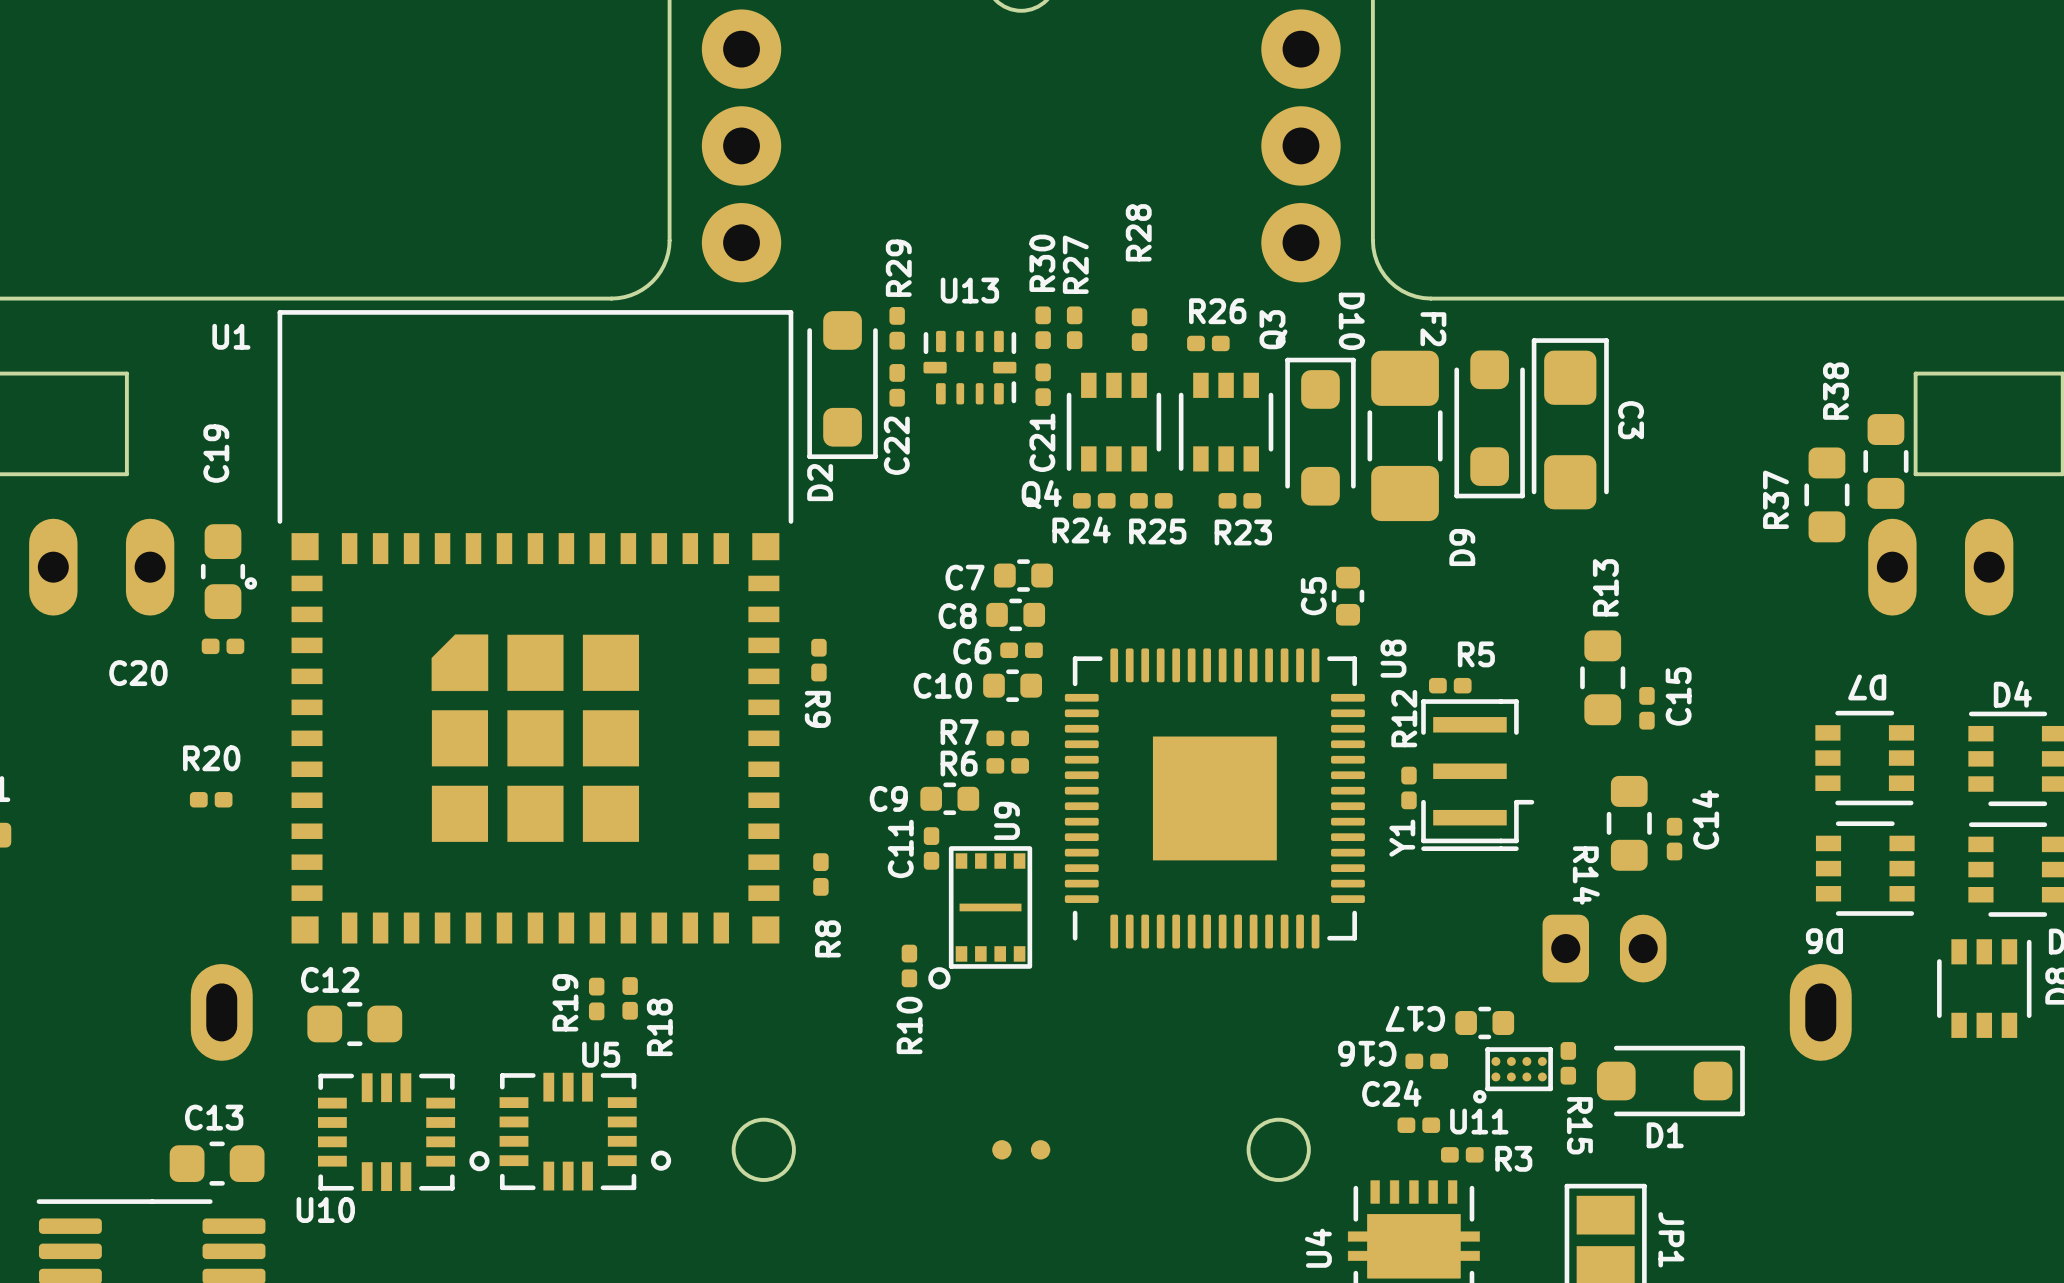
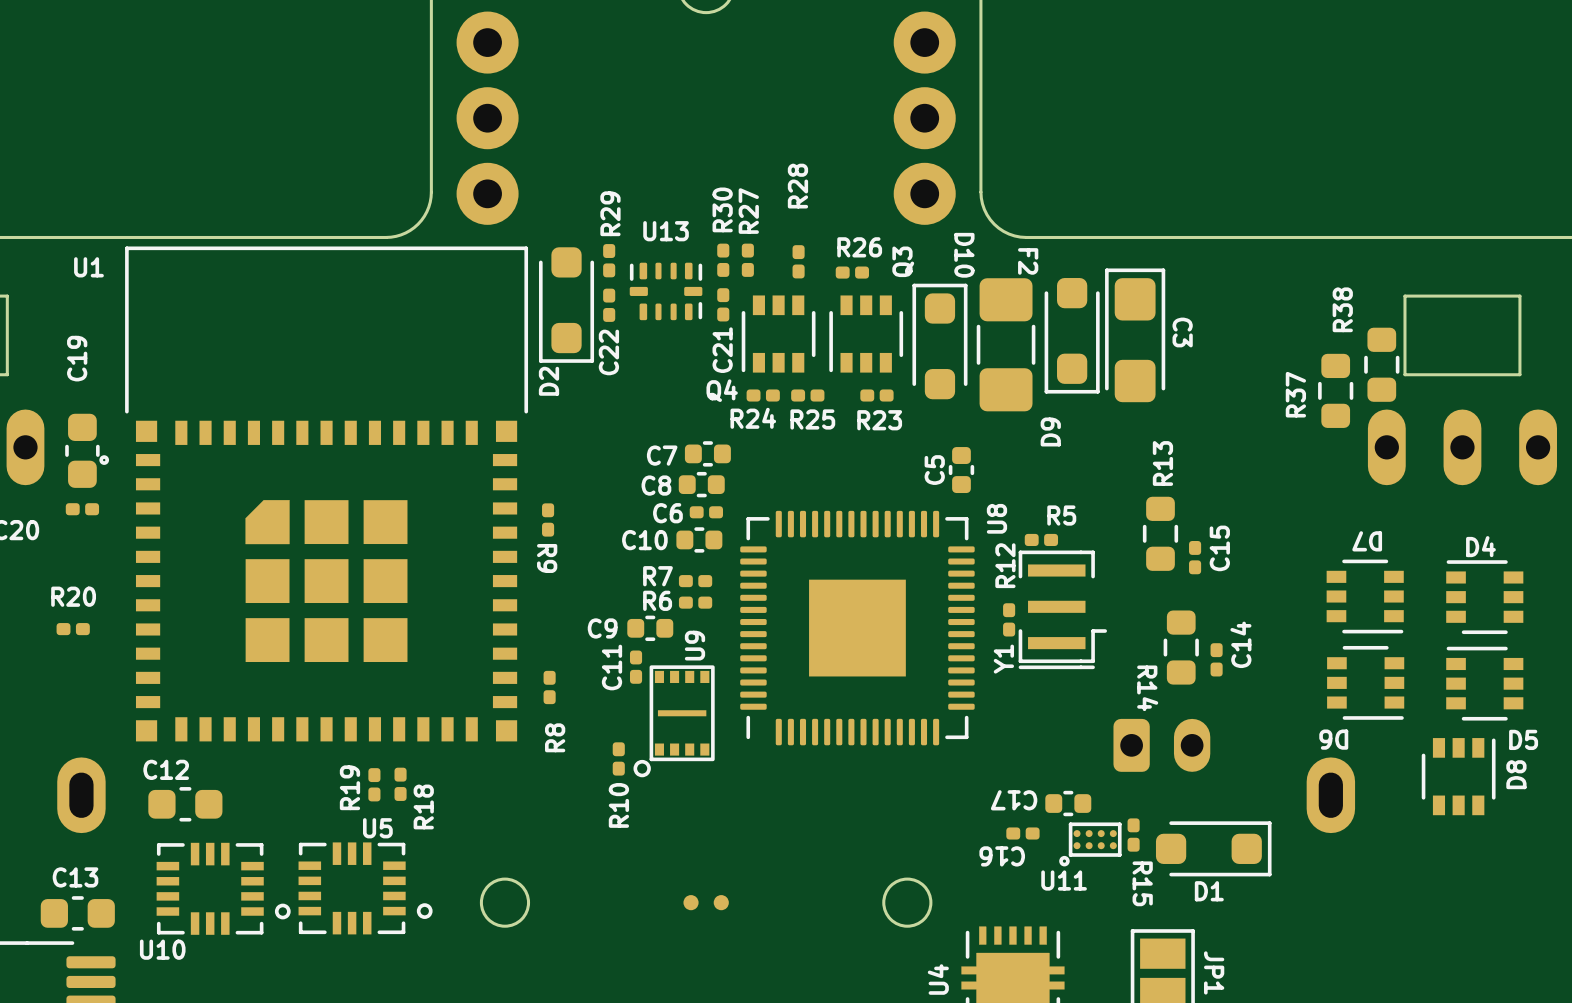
C16 name position: C16 (1367, 1053) -> C16 (1002, 856)
C24: (1418, 1125) -> none
R3: (1462, 1154) -> none

